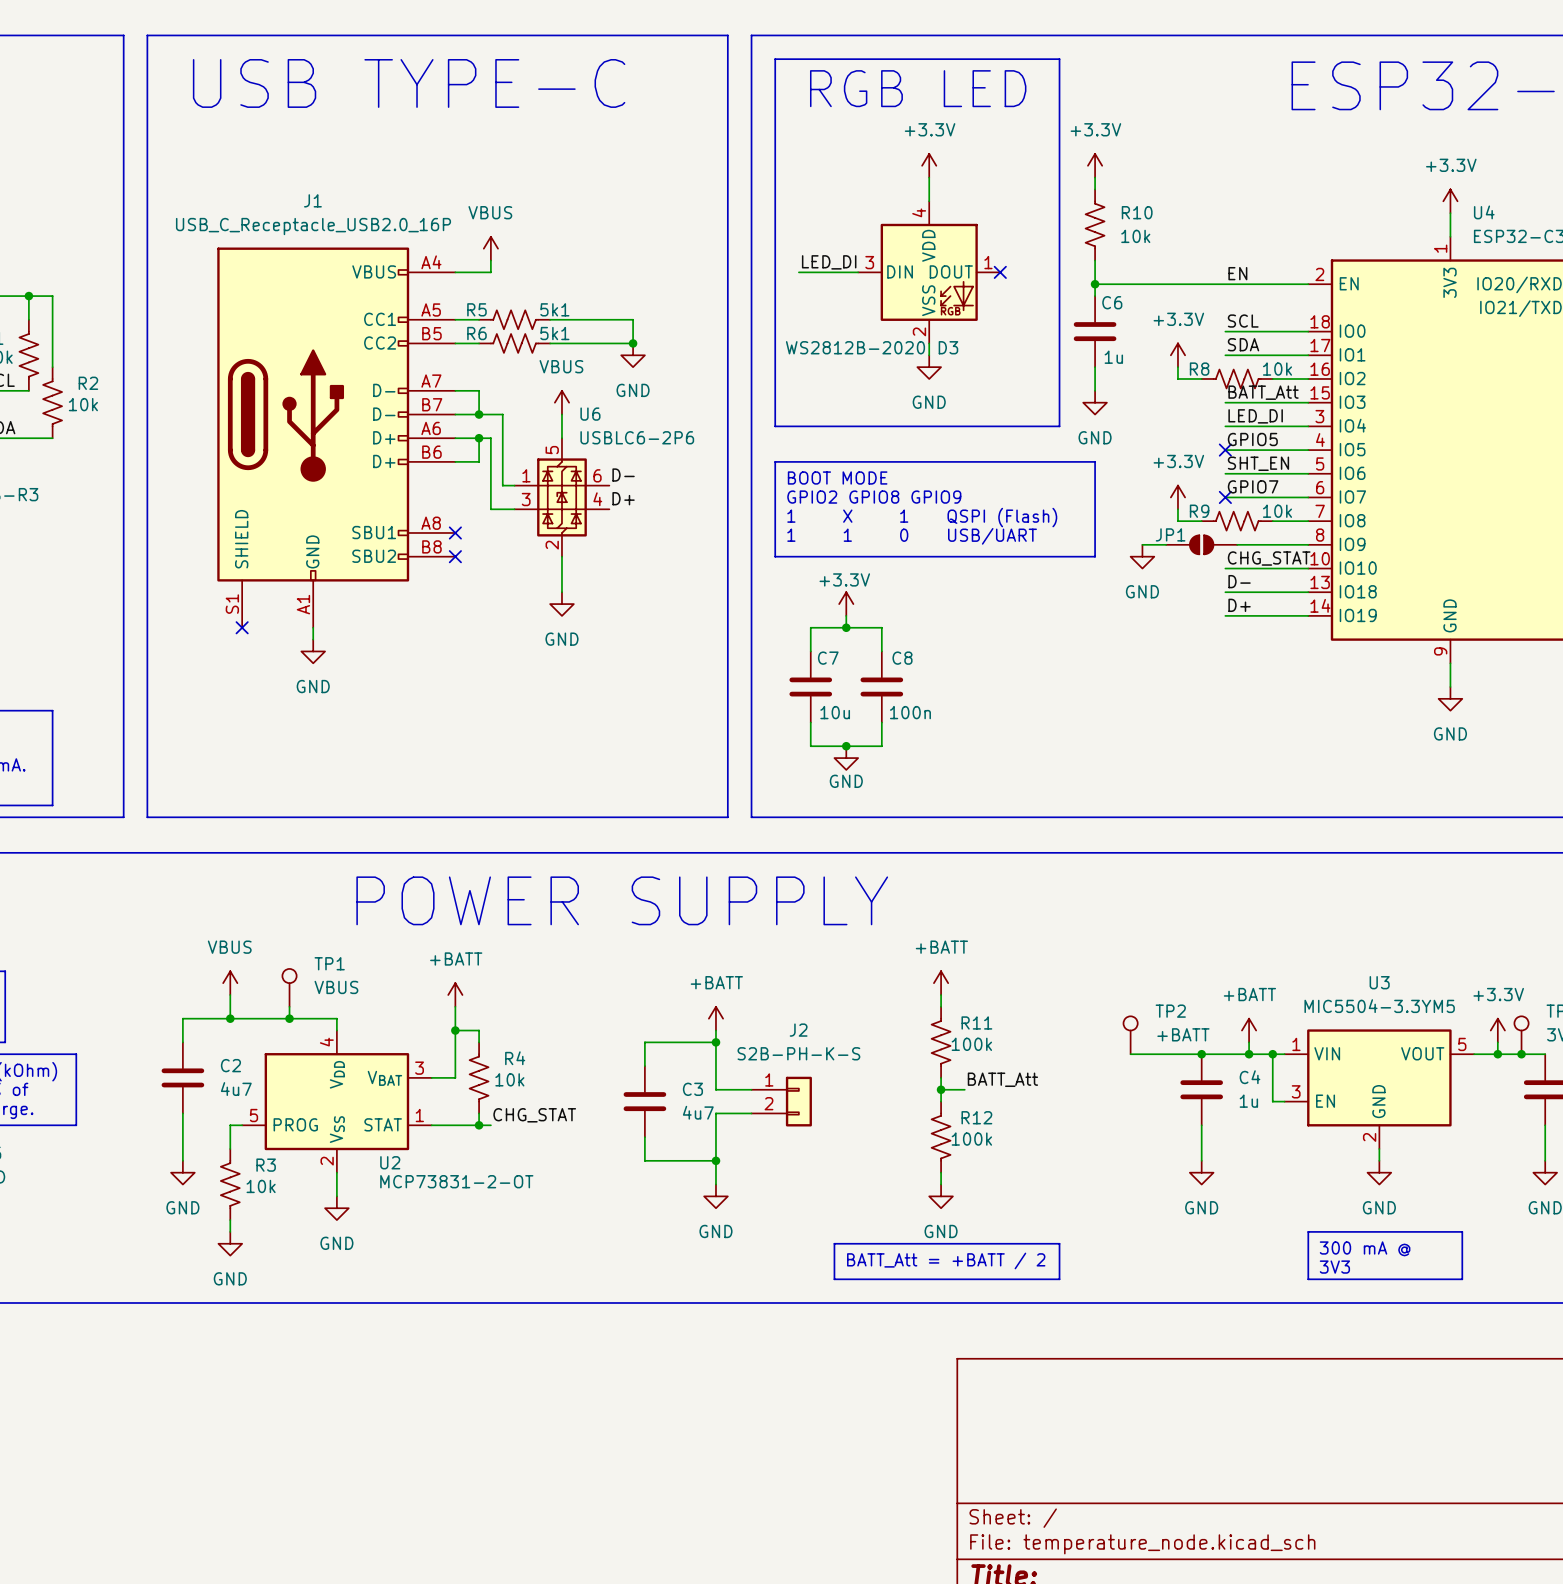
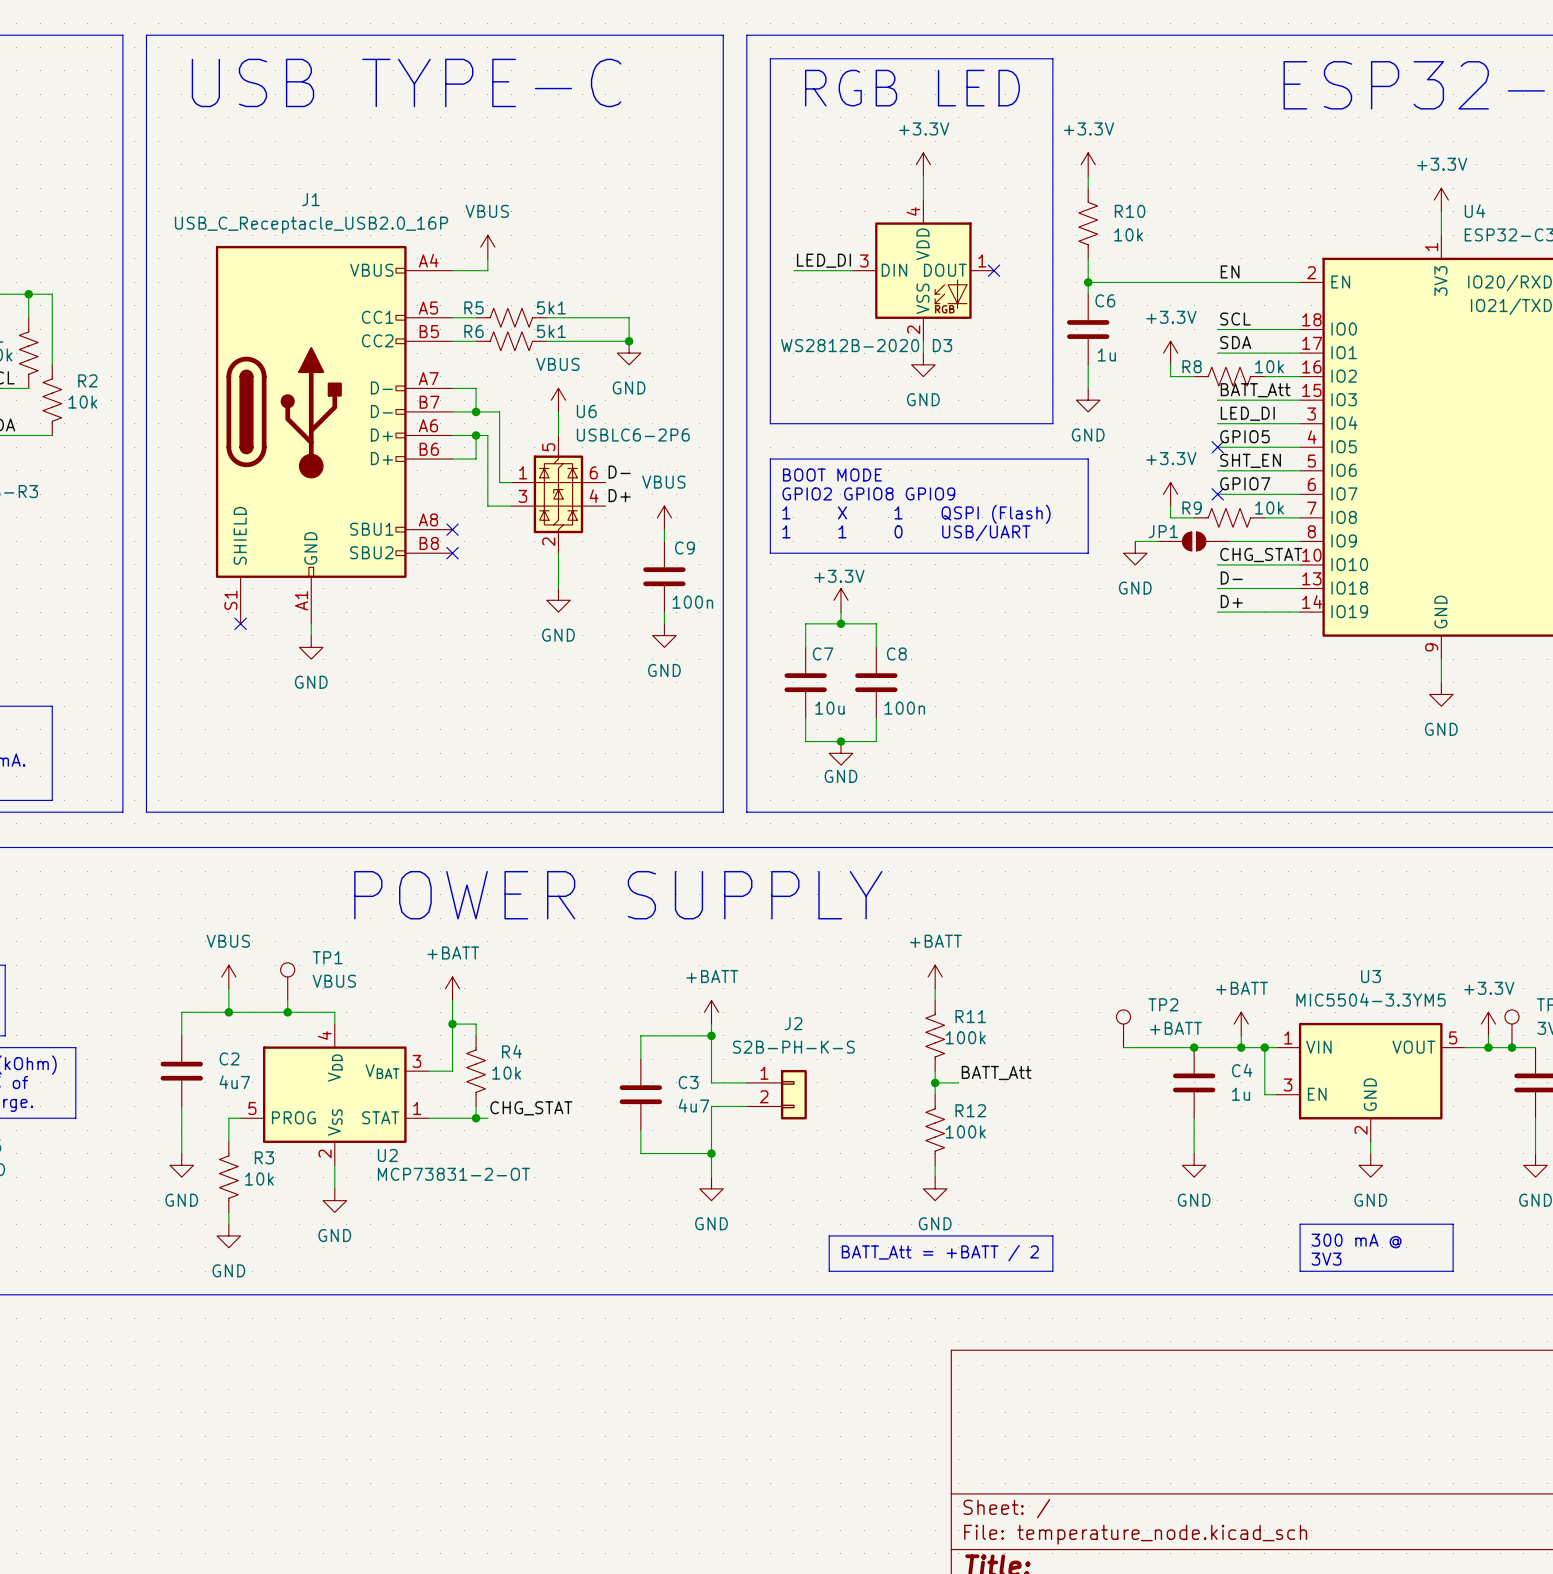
power symbol: none -> VBUS (664, 517)
wire: none -> (664, 529) (664, 541)
C9: none -> 100n (664, 576)
wire: none -> (664, 612) (664, 623)
power symbol: none -> GND (664, 635)

